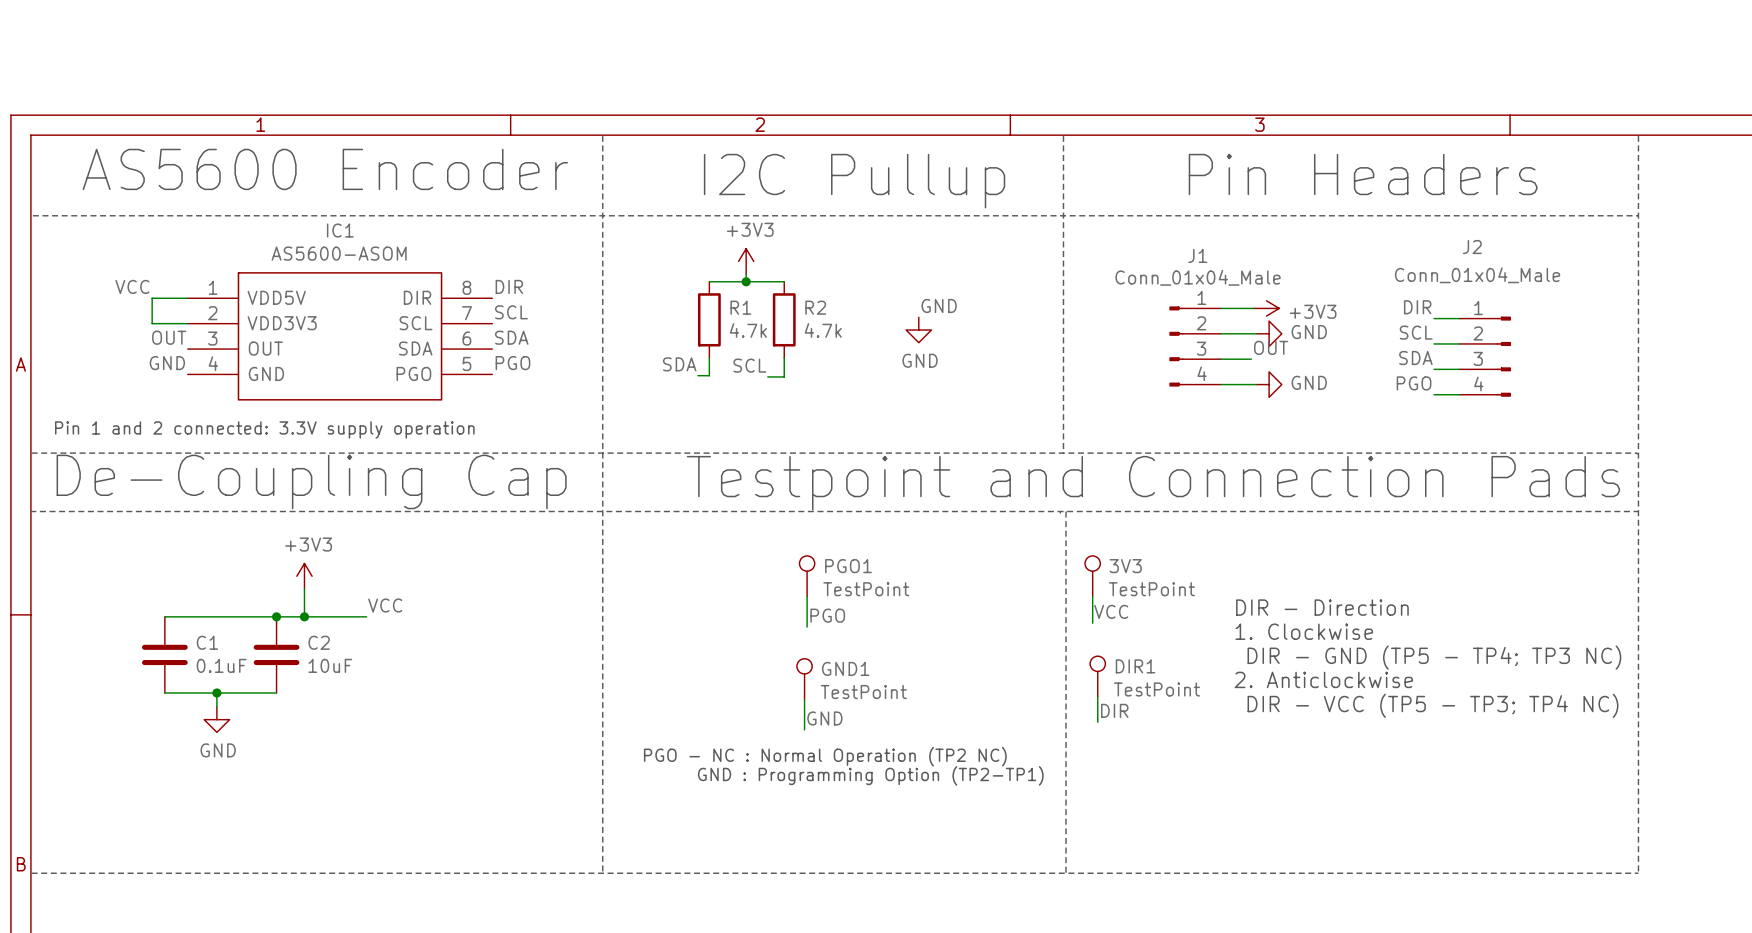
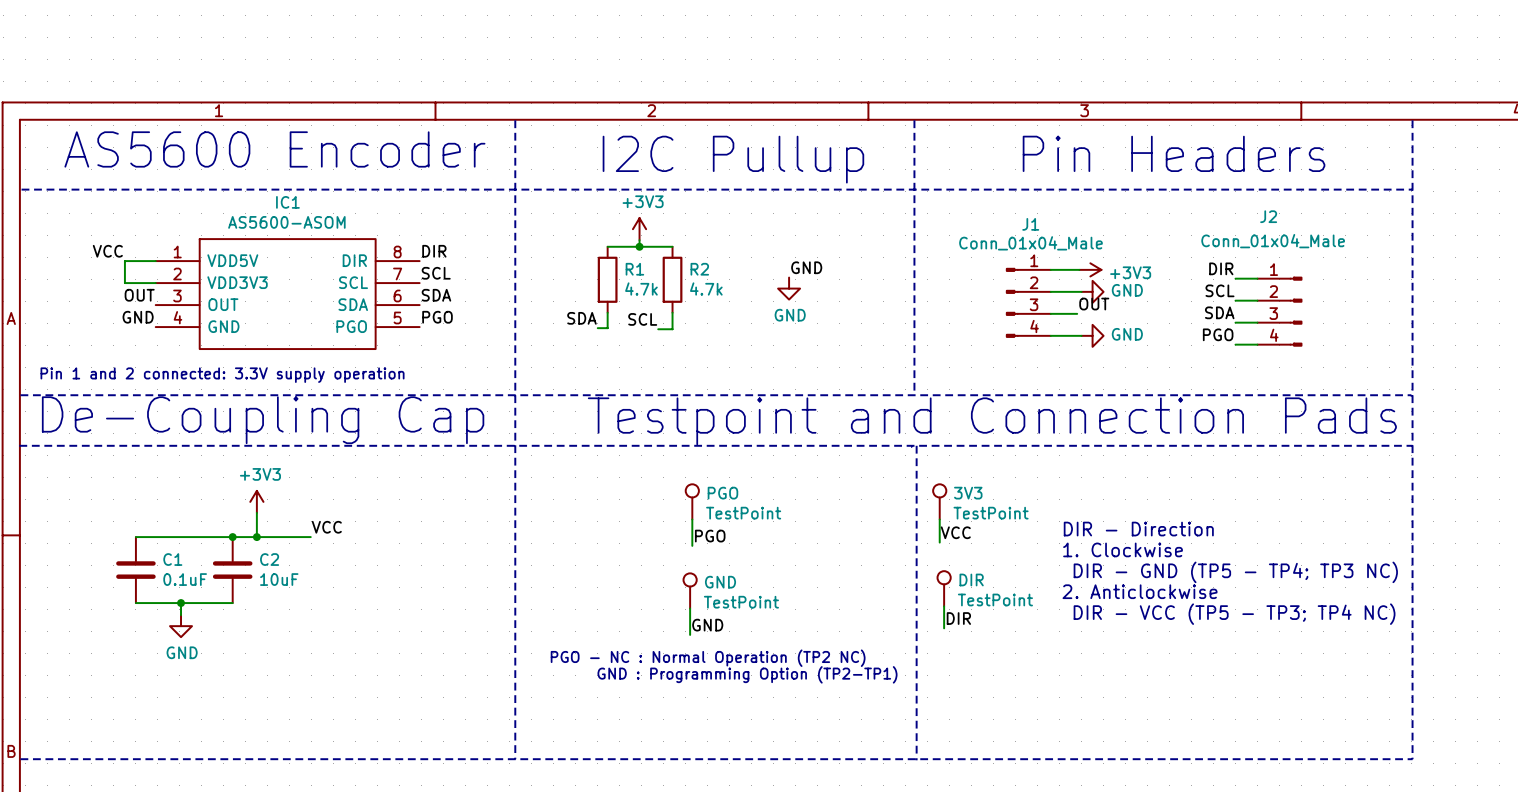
PGO1 name: PGO1 (848, 566) -> PGO (722, 493)
DIR1 name: DIR1 (1135, 666) -> DIR (971, 579)
GND1 name: GND1 (845, 668) -> GND (720, 582)

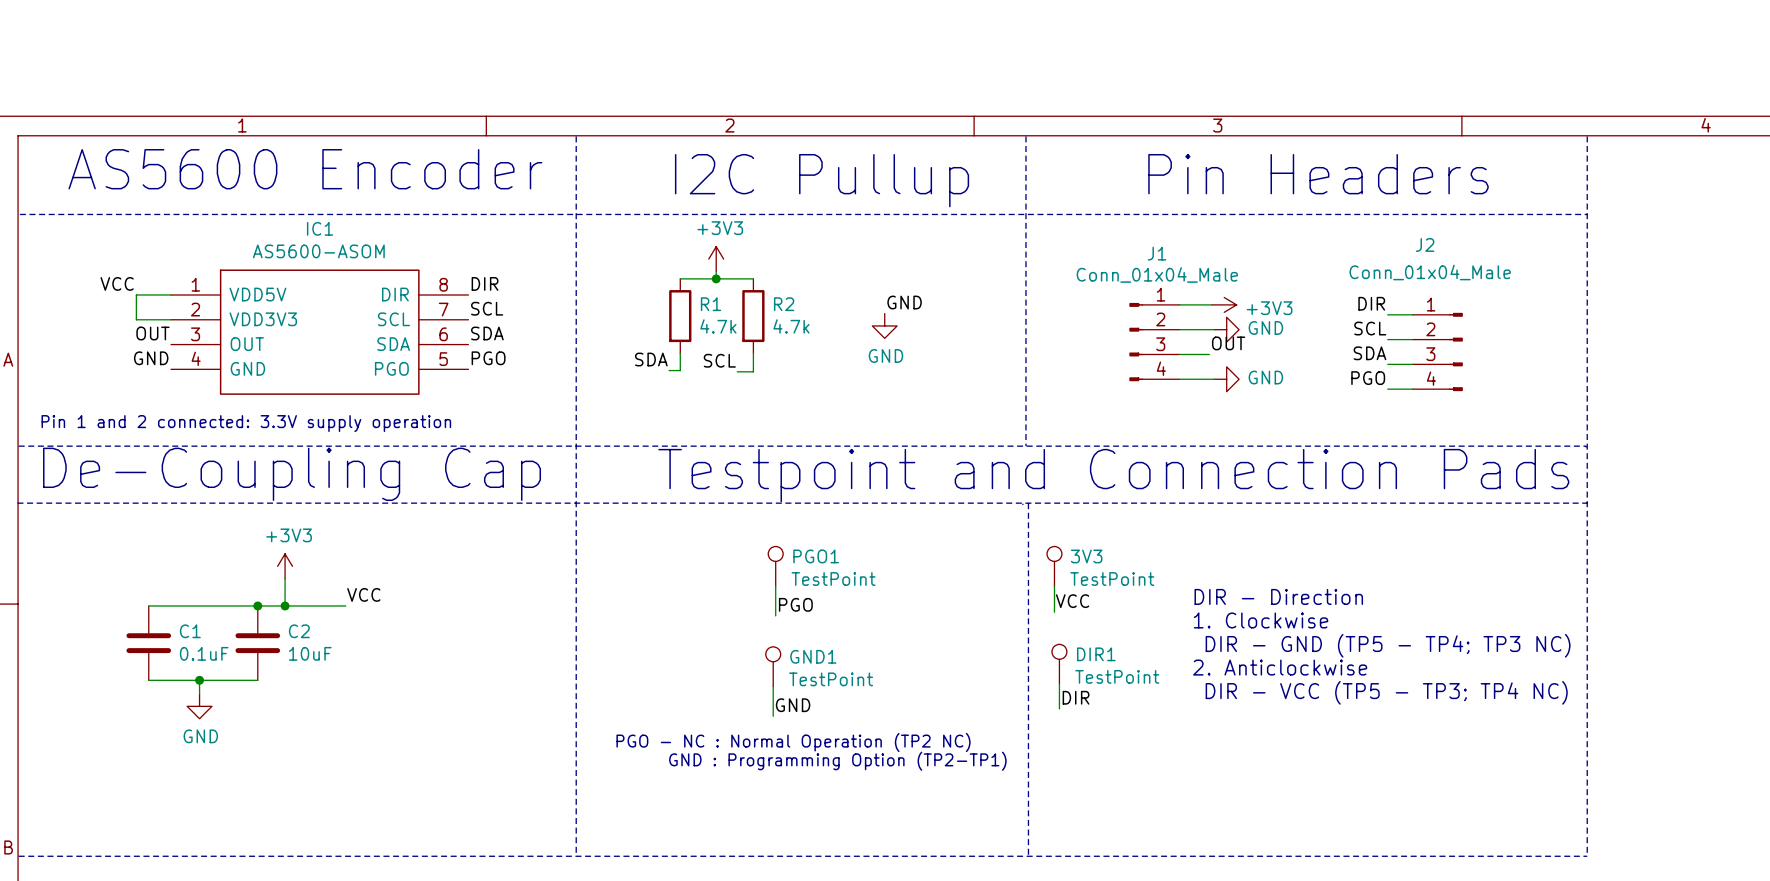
PGO name: PGO (722, 493) -> PGO1 (816, 556)
DIR name: DIR (971, 579) -> DIR1 (1096, 654)
GND name: GND (720, 582) -> GND1 (813, 656)

